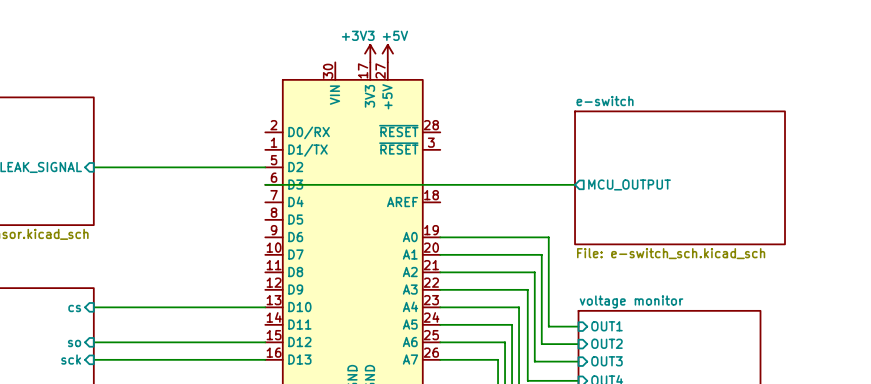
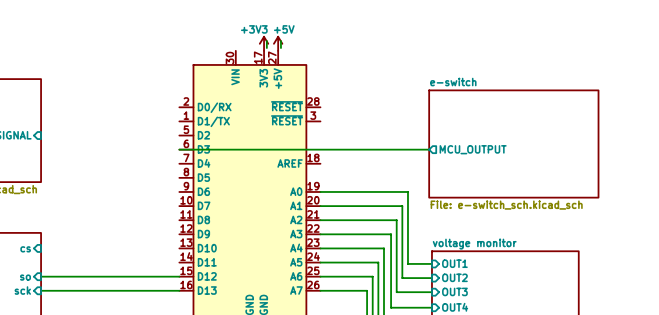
wire: none -> (266, 40) (266, 48)
wire: none -> (280, 40) (280, 48)
wire: (93, 167) (265, 167) -> none
wire: (93, 307) (265, 307) -> none

